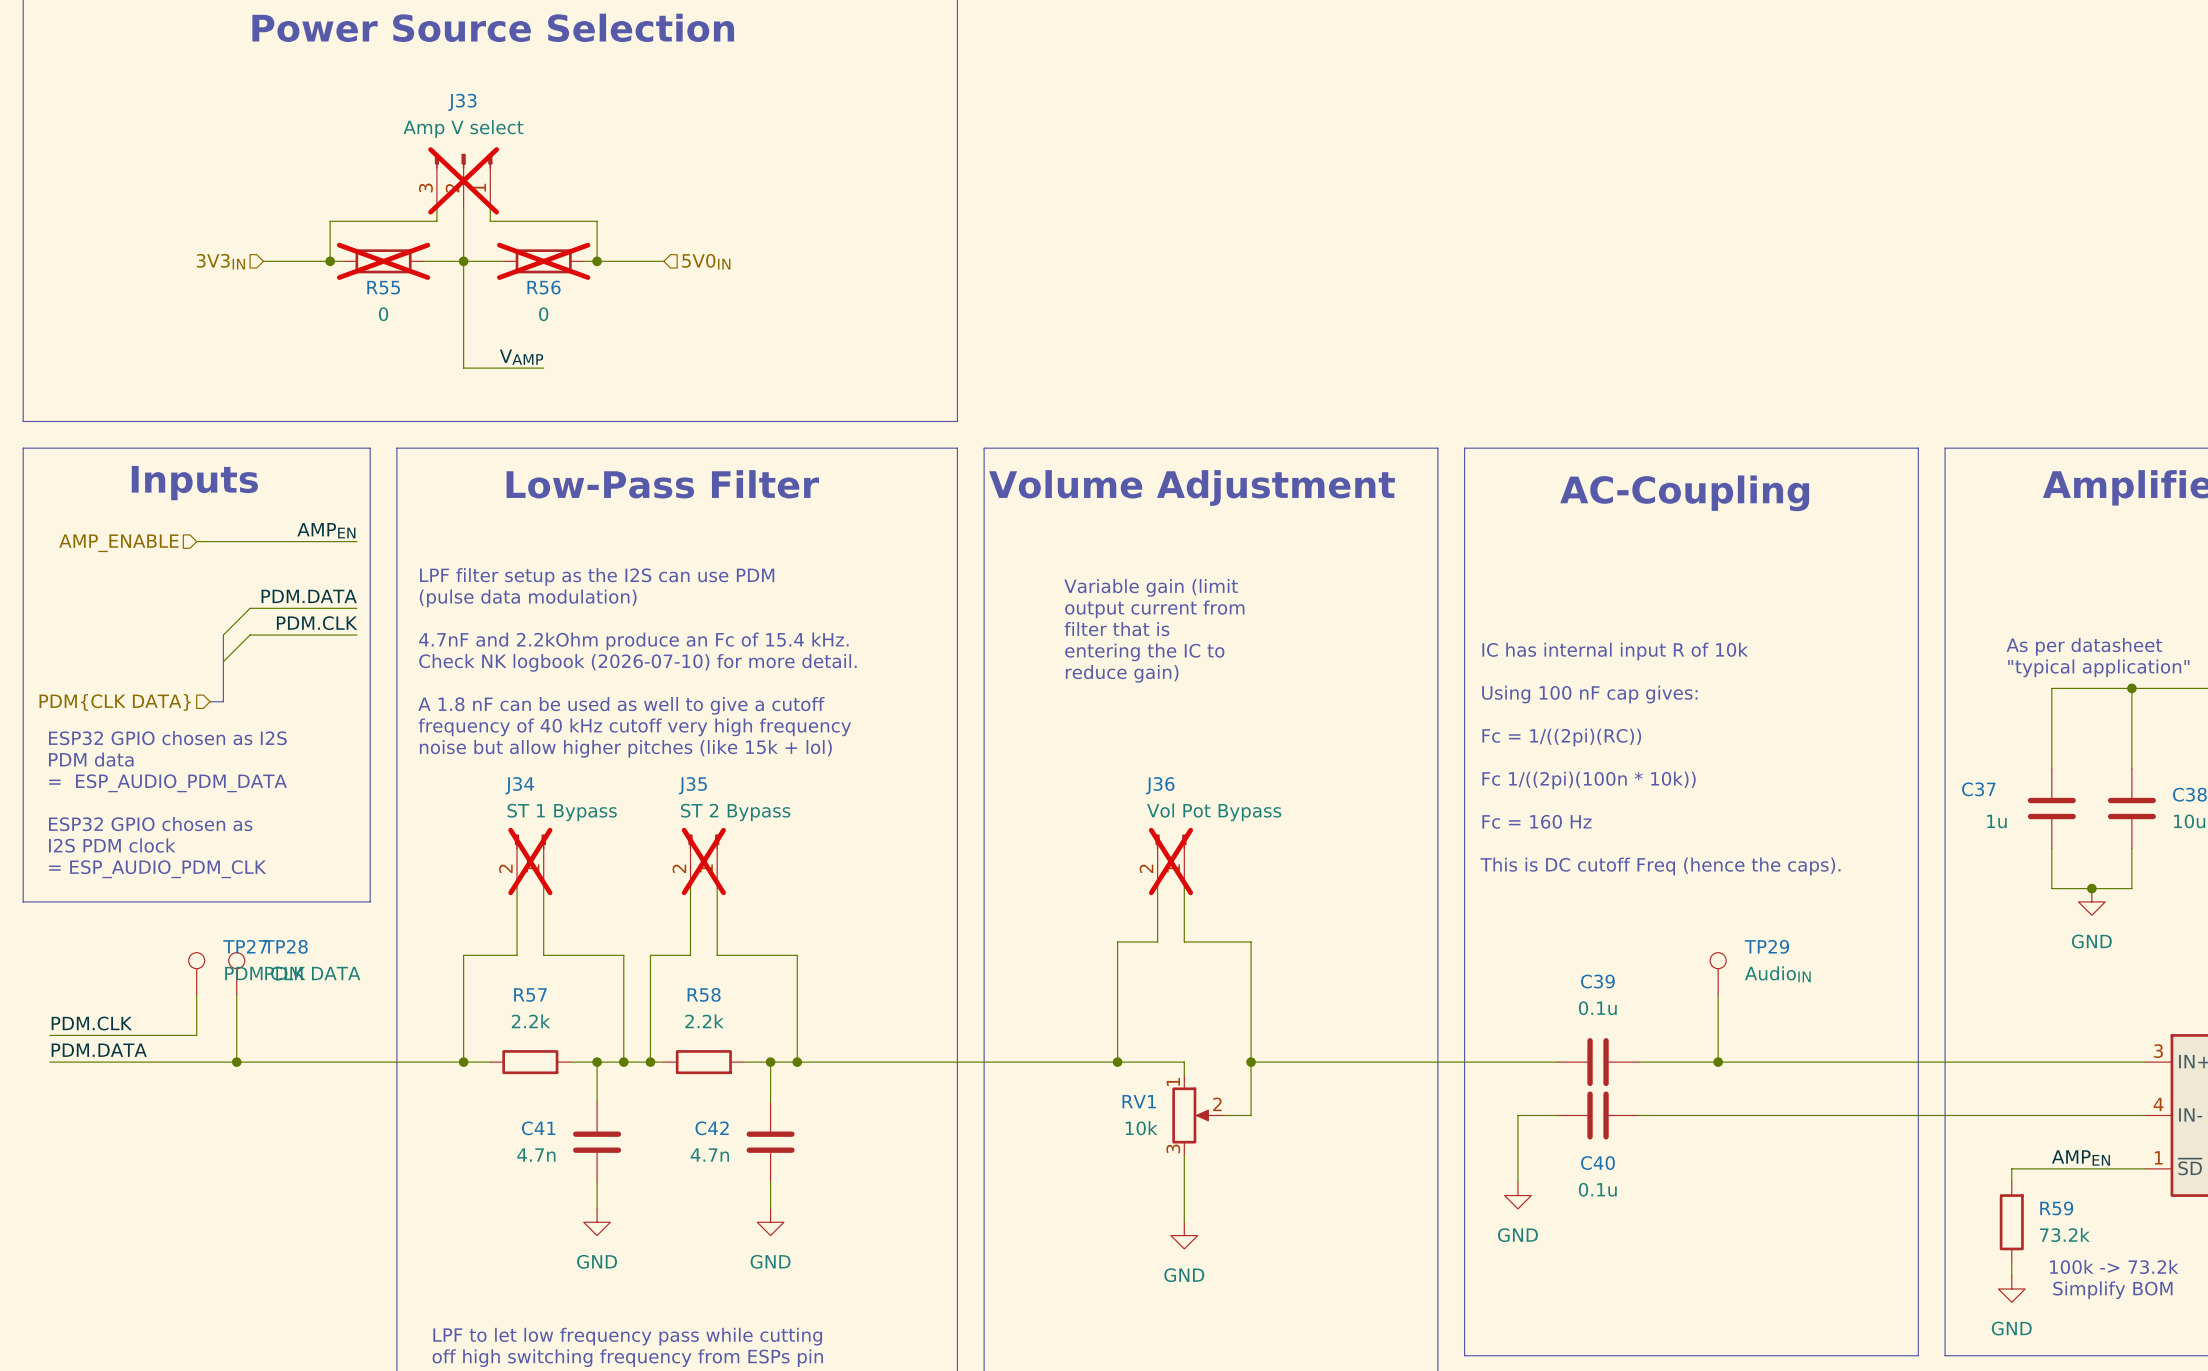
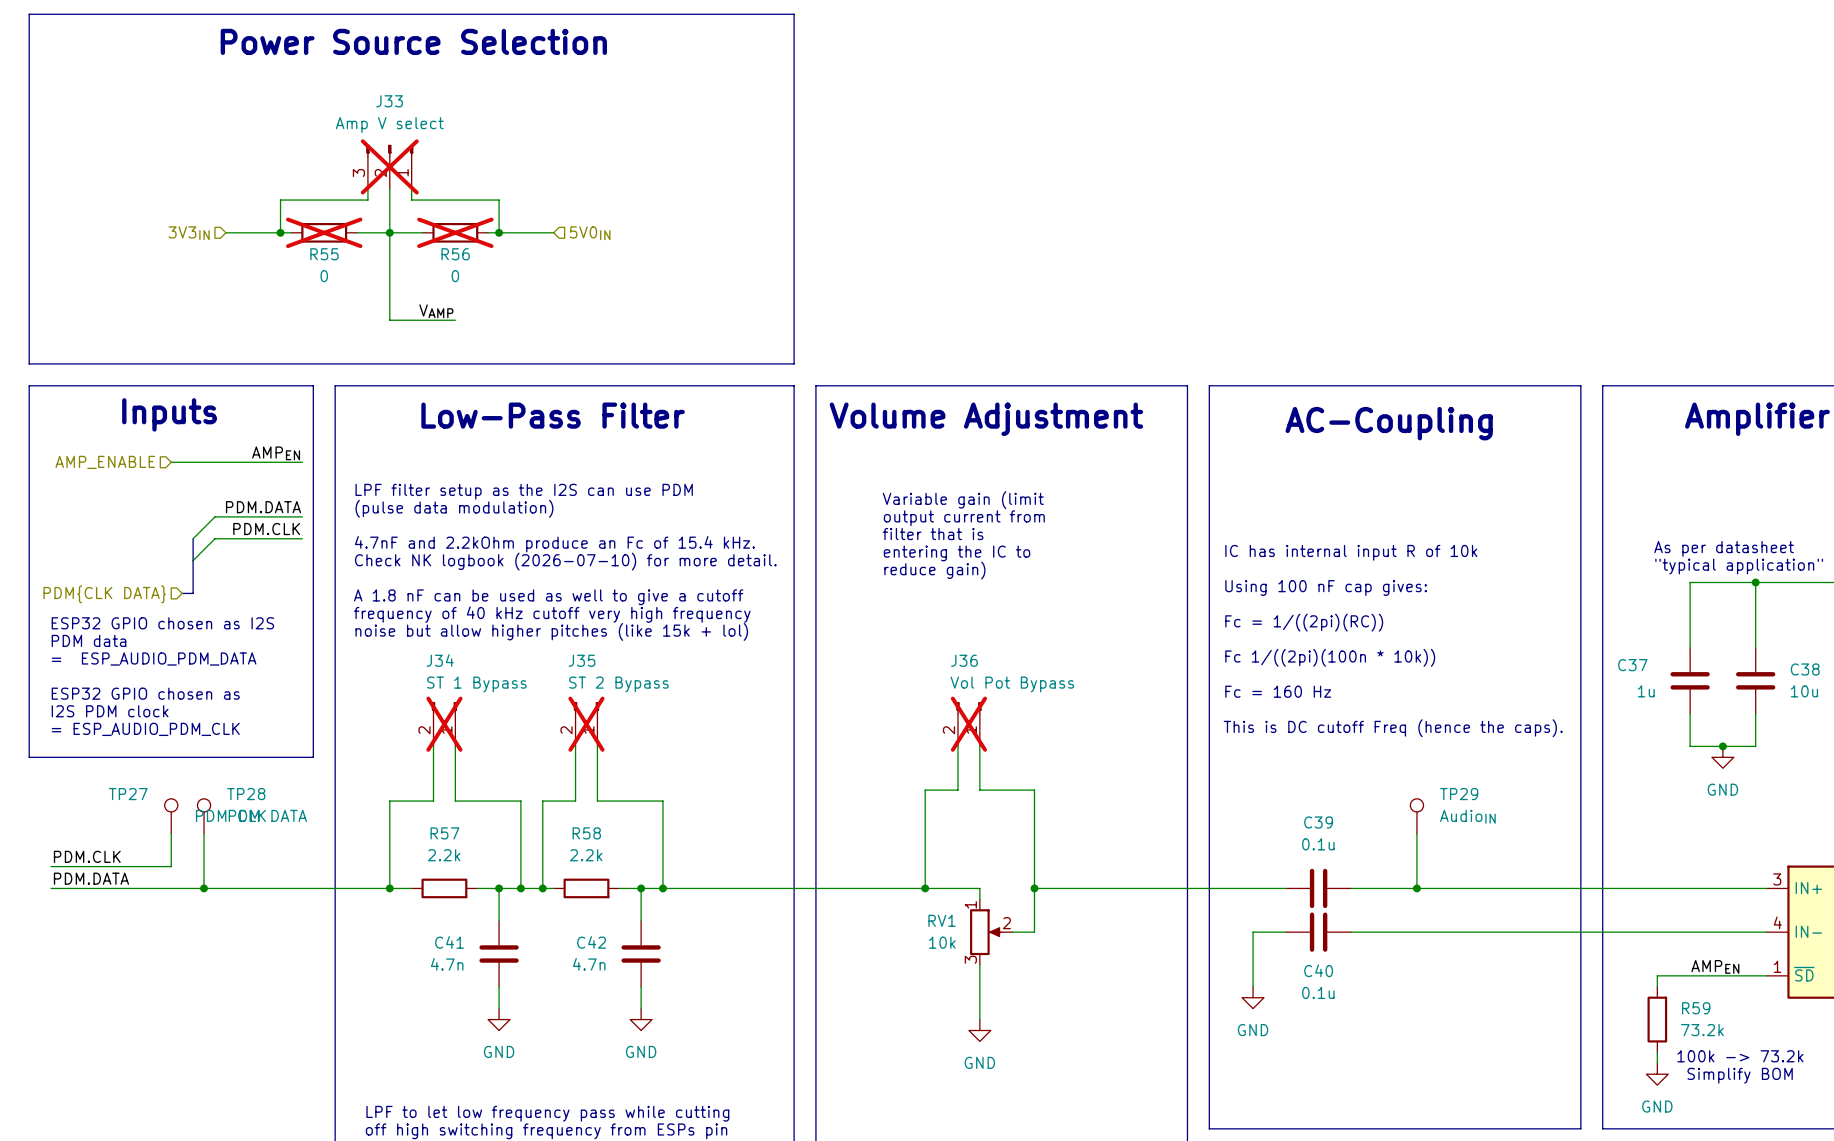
TP27 name position: TP27 (245, 946) -> TP27 (128, 794)

